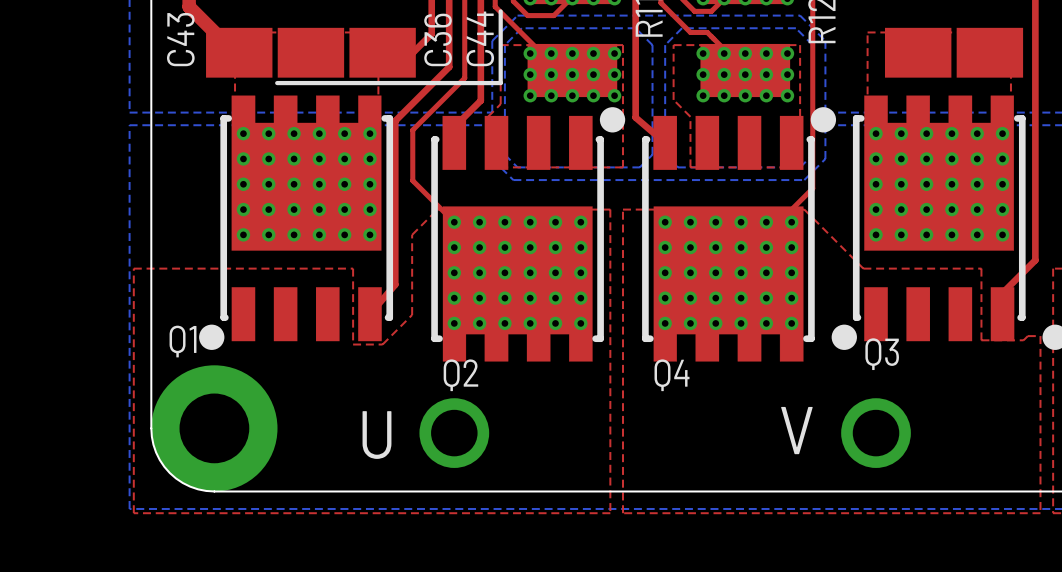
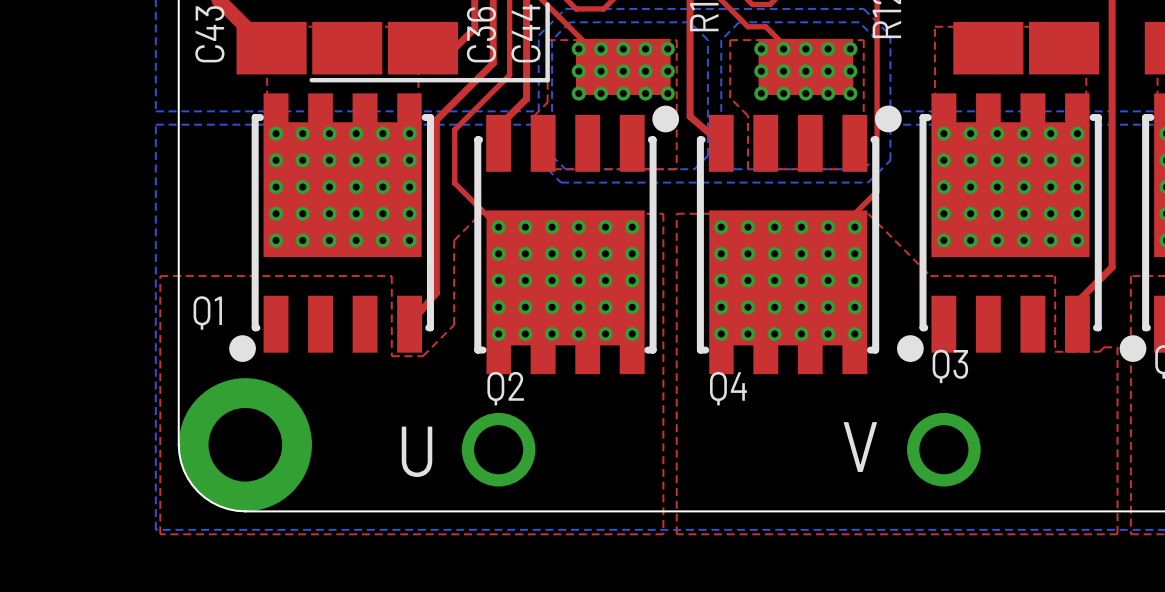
Q1 name position: Q1 (183, 341) -> Q1 (207, 312)

